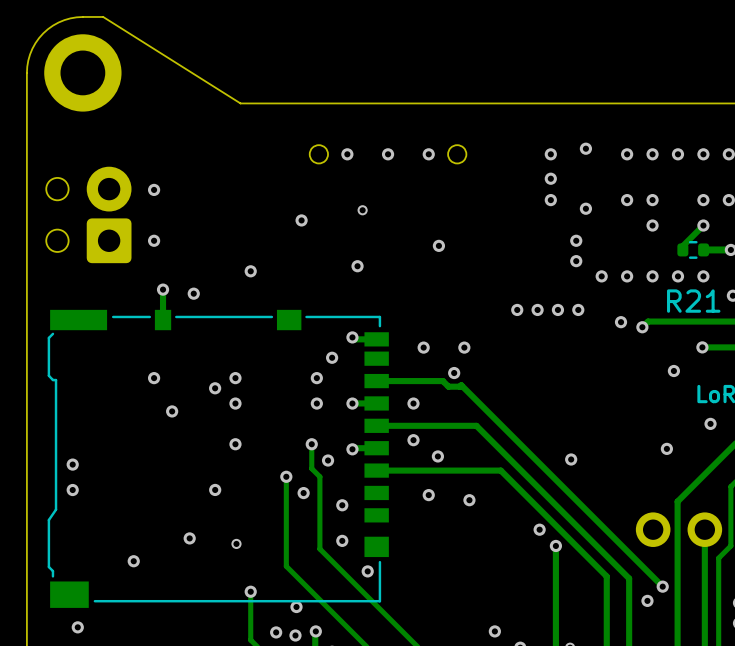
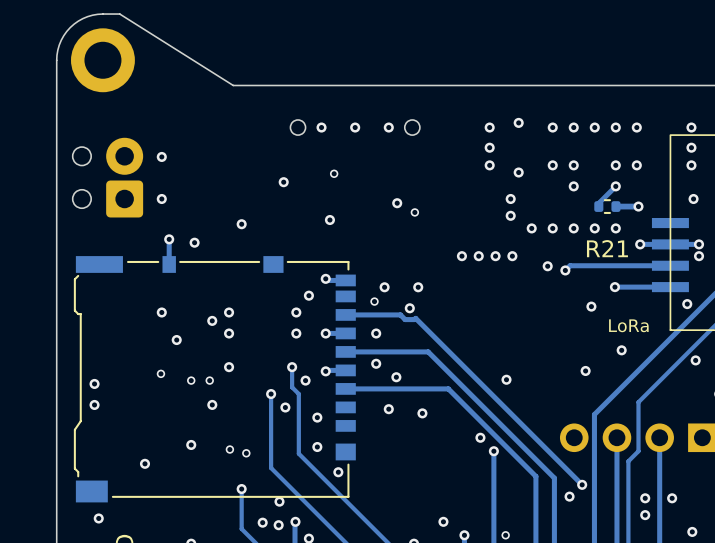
via: none -> (414, 212)
via: none -> (374, 301)
via: none -> (160, 373)
via: none -> (191, 380)
via: none -> (209, 380)
via: none -> (246, 453)

